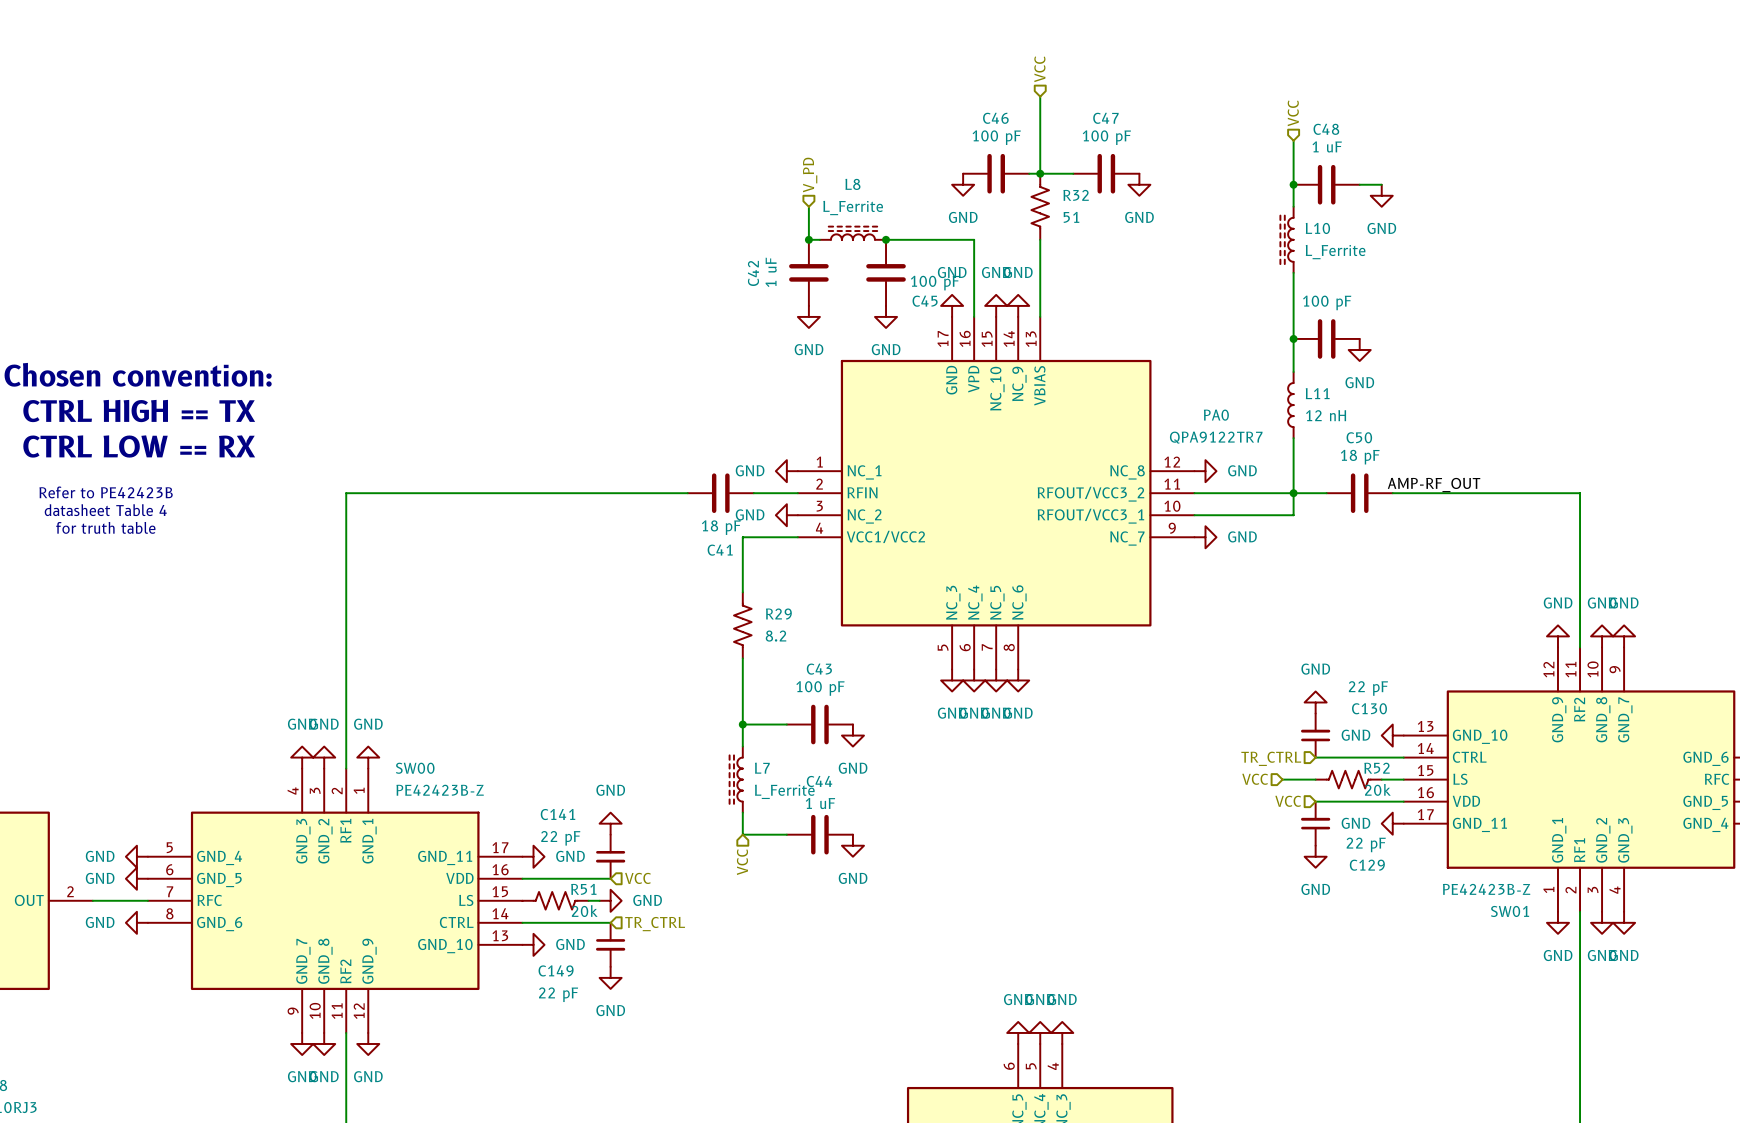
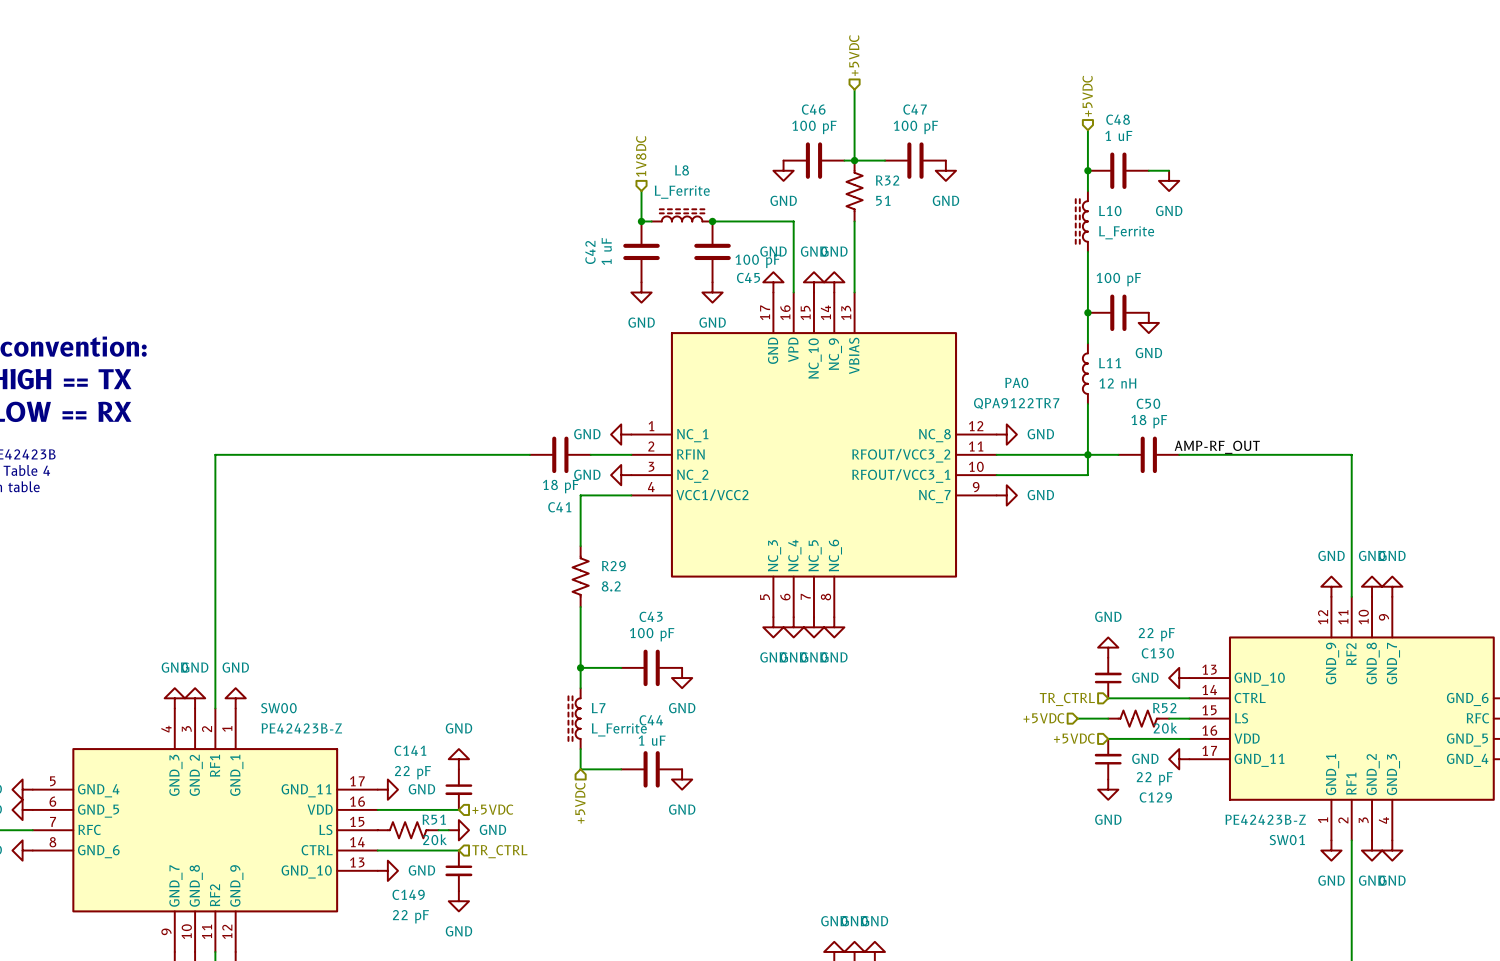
hierarchical label: VCC (1039, 69) -> +5VDC (854, 55)
hierarchical label: VCC (1293, 113) -> +5VDC (1087, 96)
hierarchical label: V_PD (810, 175) -> 1V8DC (641, 156)
hierarchical label: VCC (1255, 779) -> +5VDC (1043, 718)
hierarchical label: VCC (1288, 801) -> +5VDC (1074, 738)
hierarchical label: VCC (742, 862) -> +5VDC (580, 803)
hierarchical label: VCC (637, 878) -> +5VDC (492, 809)

